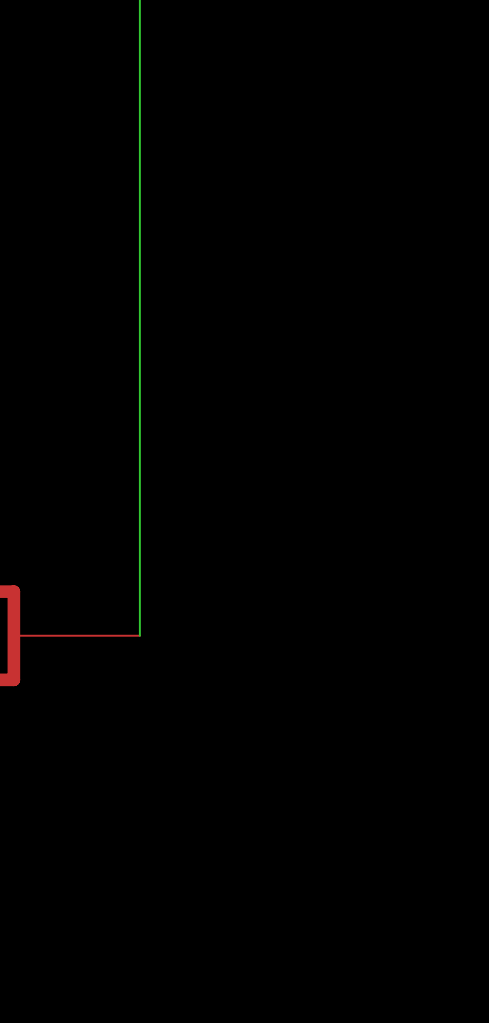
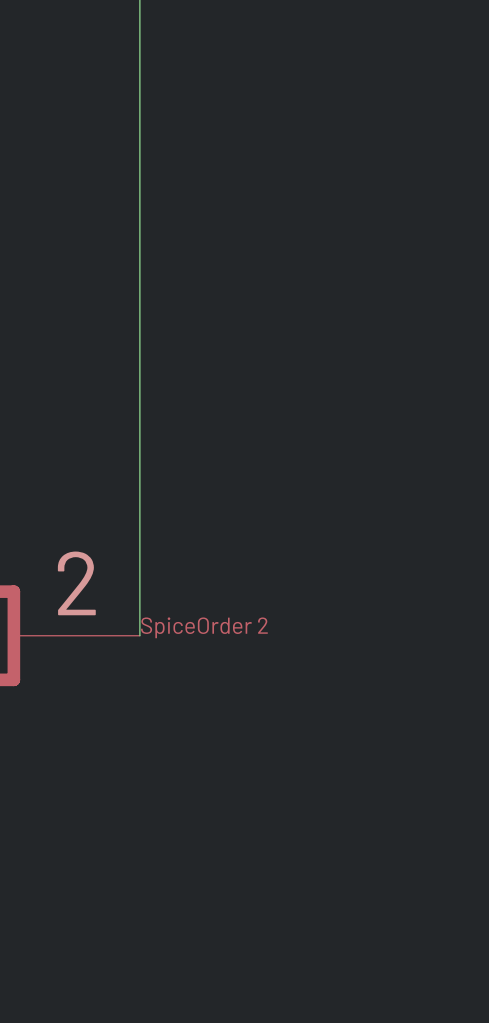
part pin number: none -> 2 (76, 583)
part text: none -> SpiceOrder 2 (204, 627)

